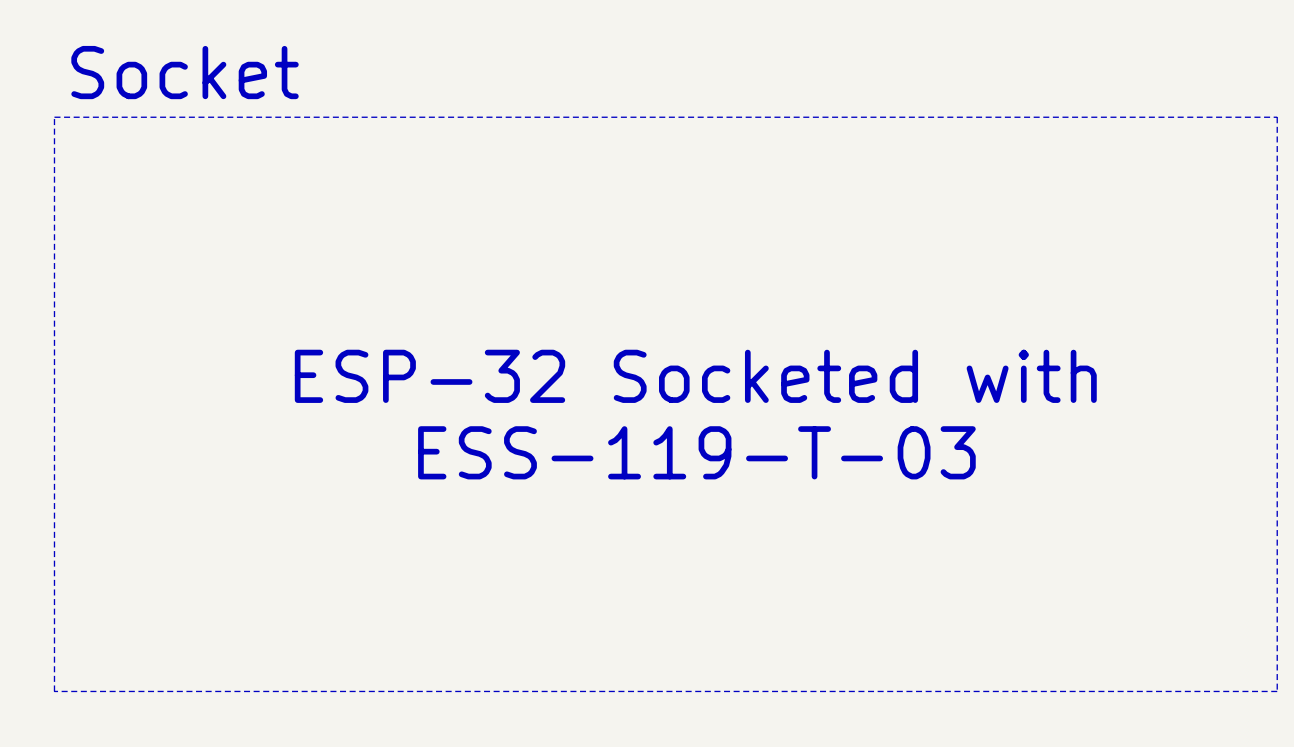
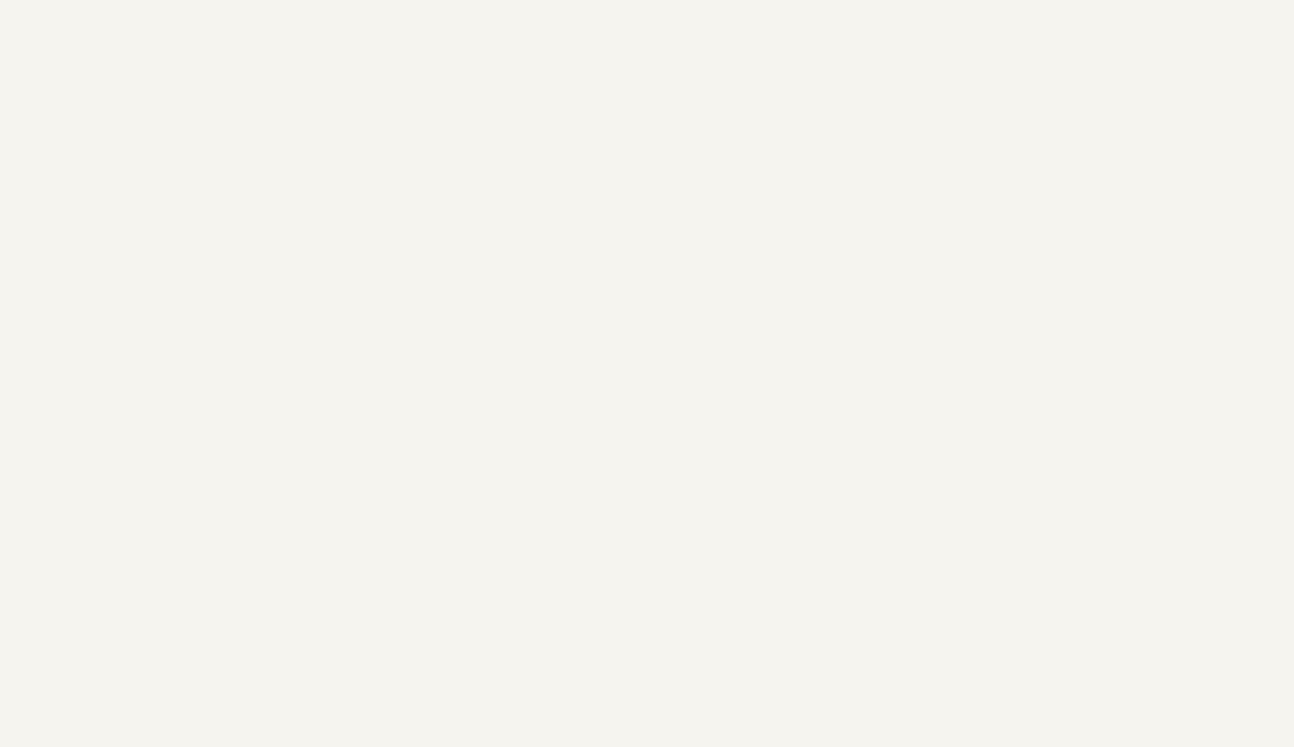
text: Socket (185, 72) -> none
line: (54, 117) (1277, 117) (1277, 691) (54, 691) (54, 117) -> none
text: ESP-32 Socketed with (695, 376) -> none
text: ESS-119-T-03 (696, 452) -> none

